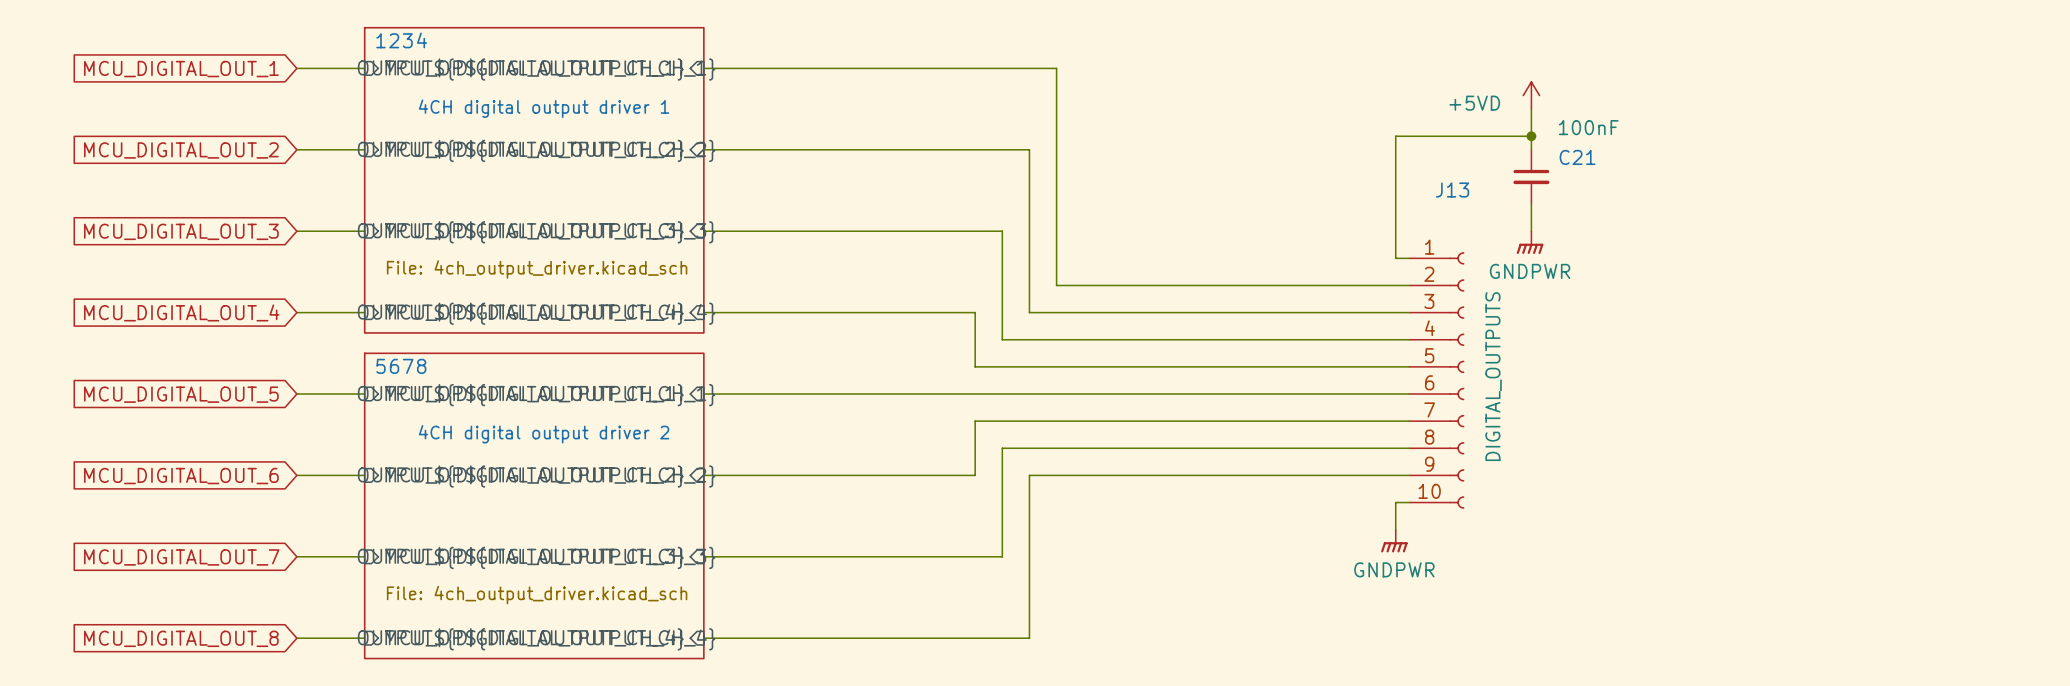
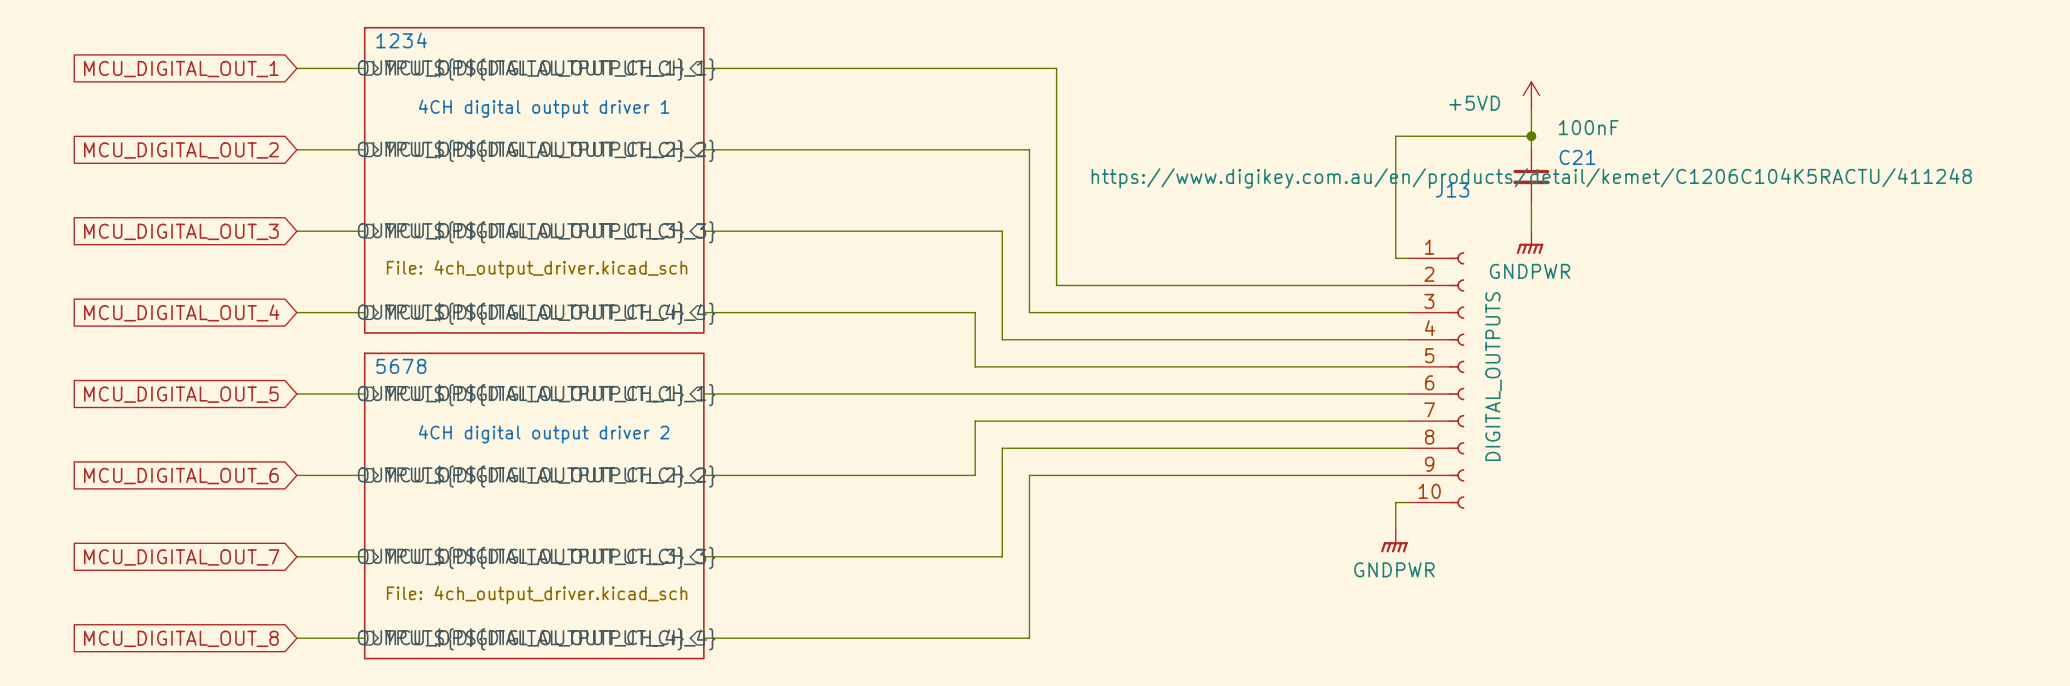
C21 text: none -> https://www.digikey.com.au/en/products/detail/kemet/C1206C104K5RACTU/411248 (1531, 178)

